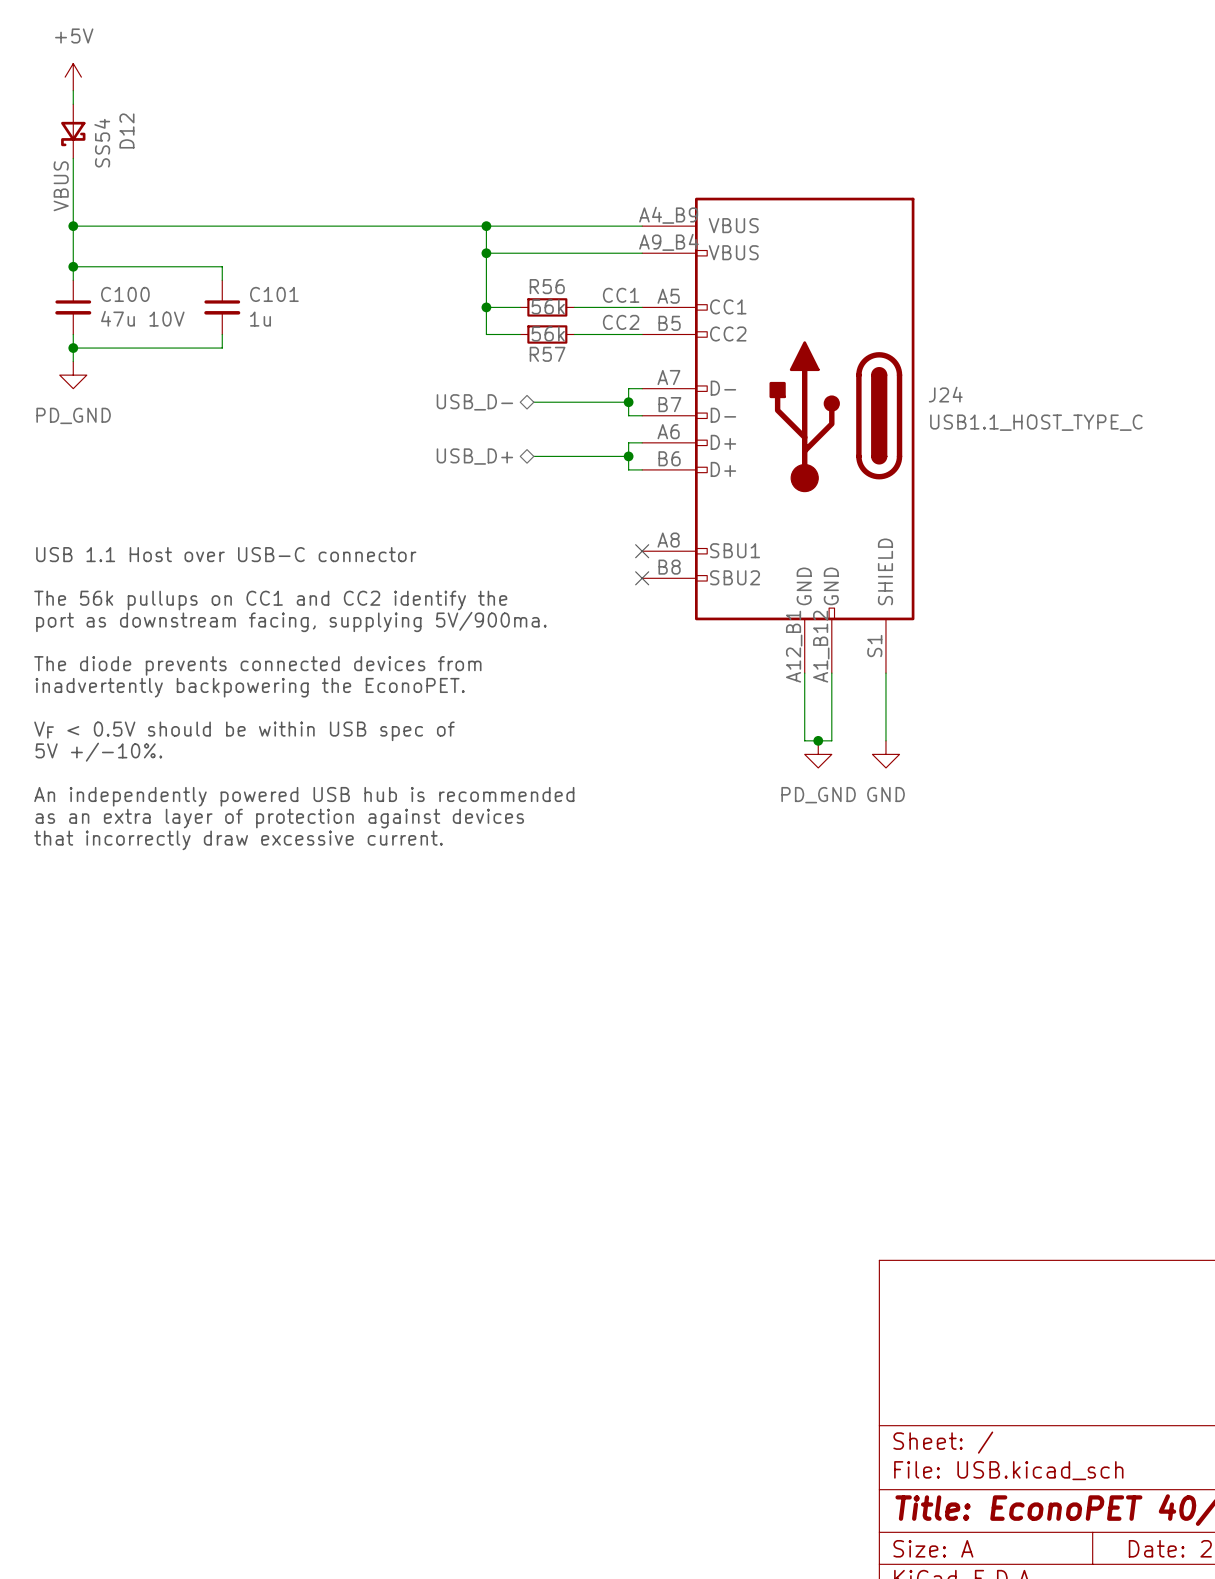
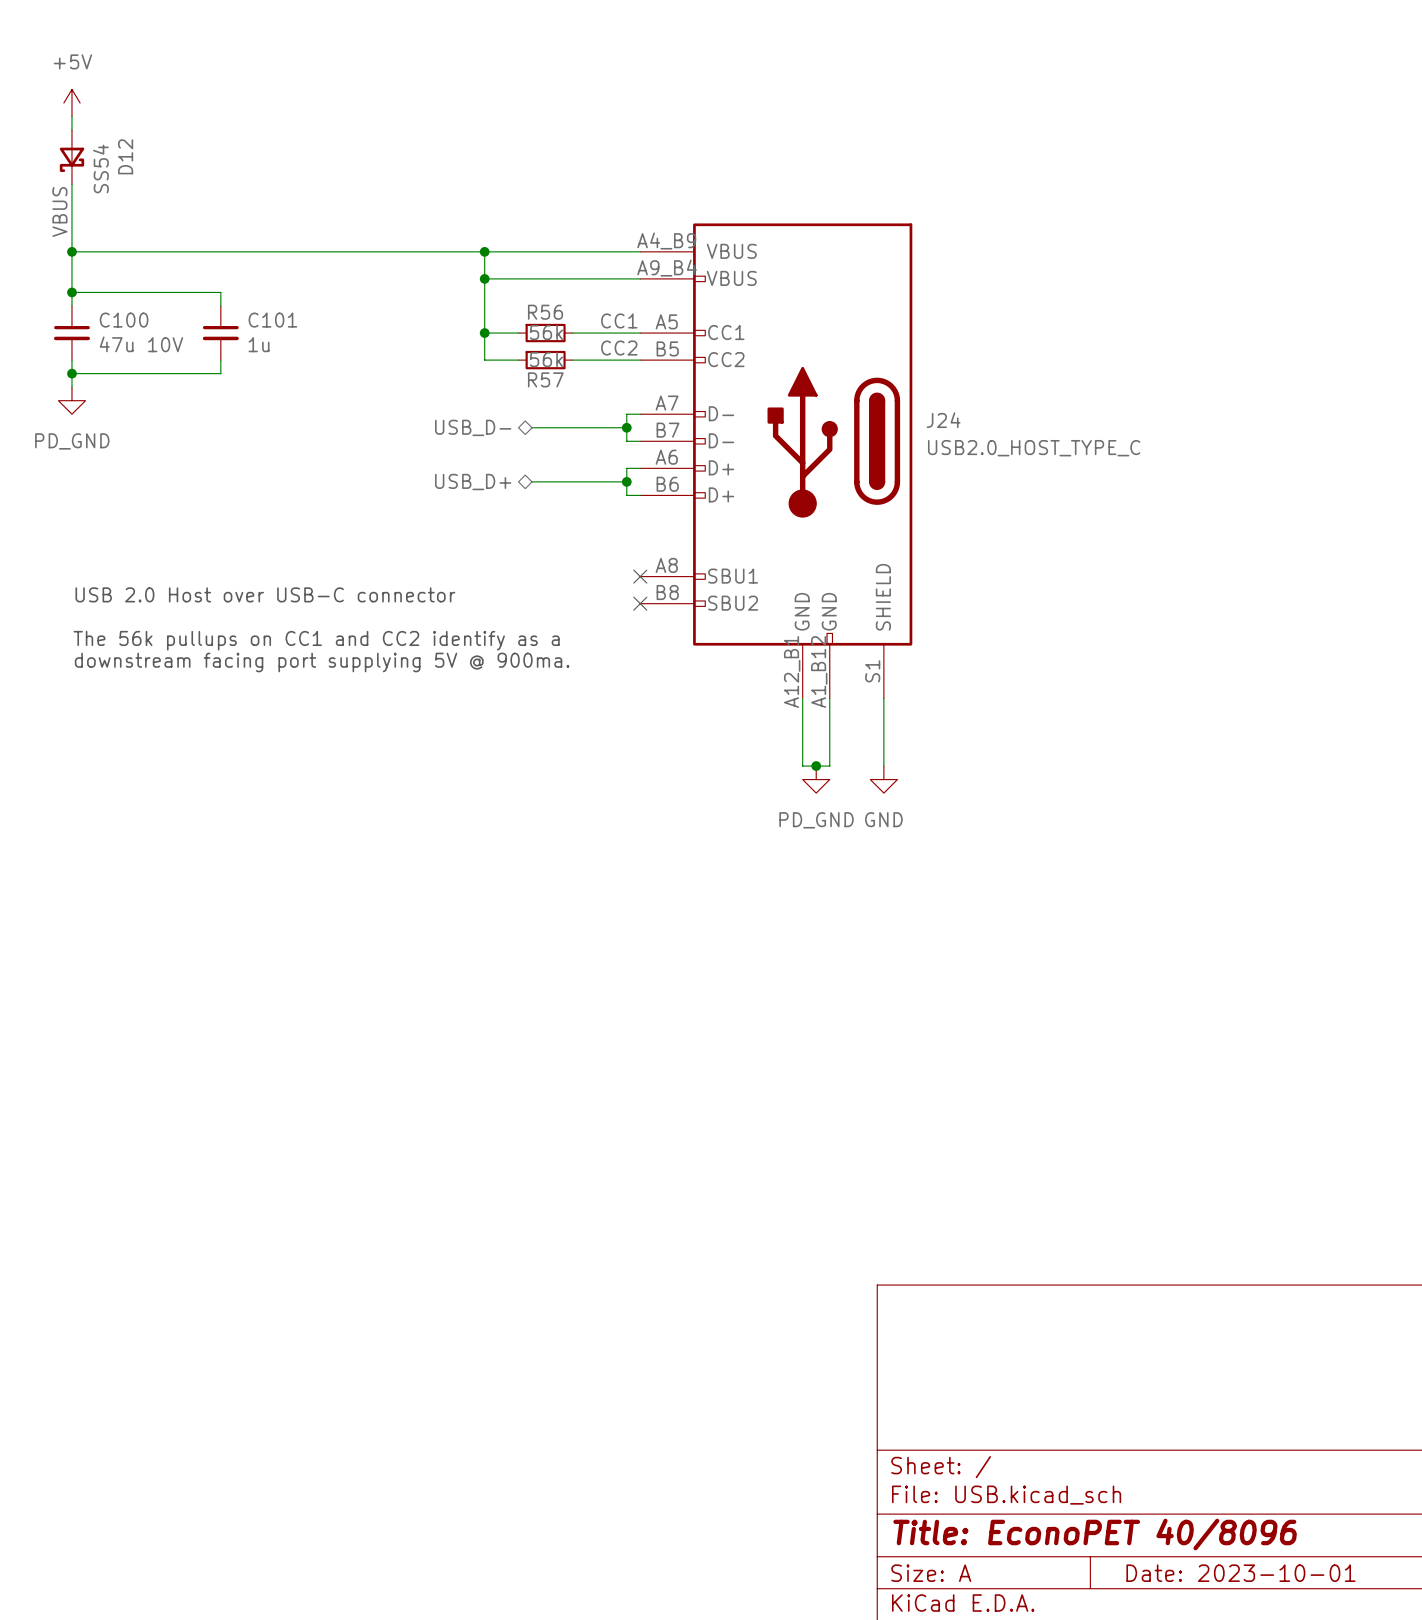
J24 value: USB1.1_HOST_TYPE_C (1036, 422) -> USB2.0_HOST_TYPE_C (1034, 448)
text: USB 1.1 Host over USB-C connector (226, 554) -> USB 2.0 Host over USB-C connector (265, 594)
text: The 56k pullups on CC1 and CC2 identify the (270, 600) -> The 56k pullups on CC1 and CC2 identify as a (316, 640)
text: port as downstream facing, supplying 5V/900ma. (291, 621) -> downstream facing port supplying 5V @ 900ma. (322, 662)
text: The diode prevents connected devices from (257, 665) -> none
text: inadvertently backpowering the EconoPET. (250, 687) -> none
text: VF < 0.5V should be within USB spec of (244, 731) -> none
text: 5V +/-10%. (98, 752) -> none
text: An independently powered USB hub is recommended (304, 796) -> none
text: as an extra layer of protection against devices (279, 818) -> none
text: that incorrectly draw excessive current. (238, 840) -> none

